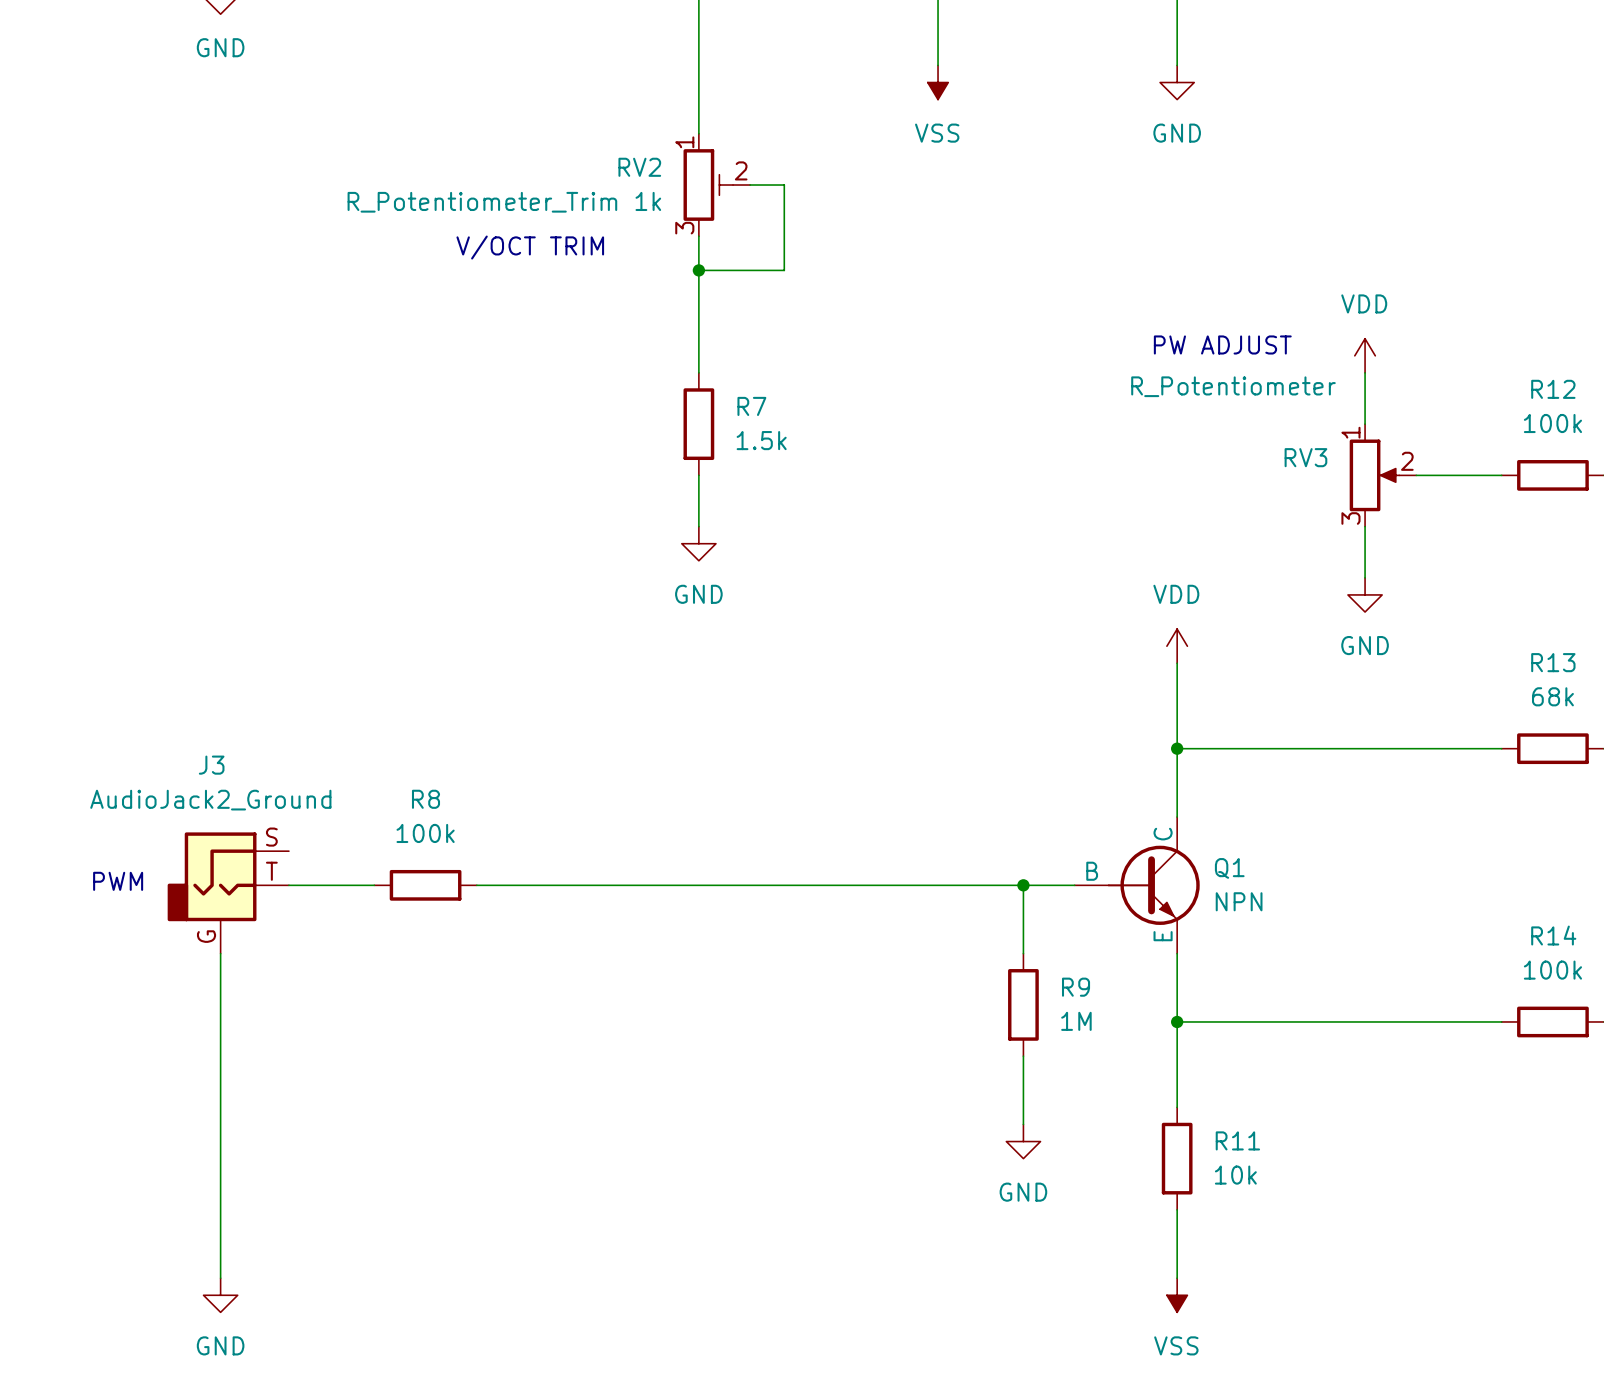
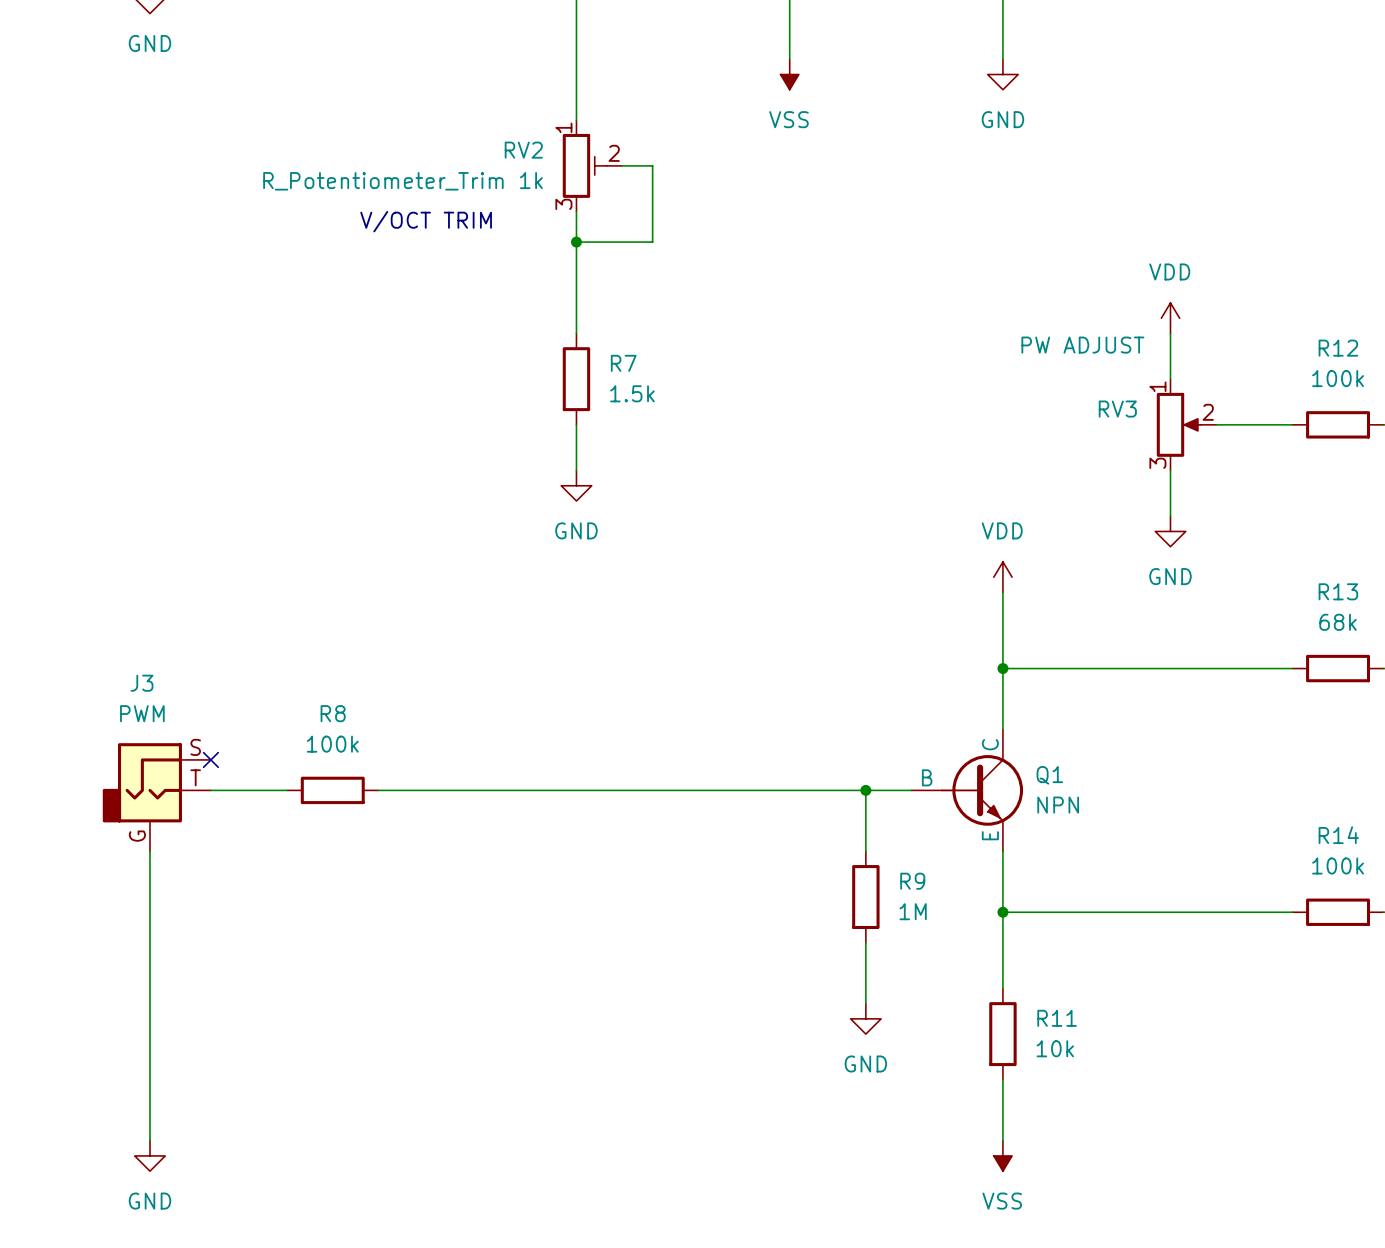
text: PW ADJUST (1222, 344) -> none
RV3 value: R_Potentiometer (1233, 386) -> PW ADJUST (1082, 345)
J3 value: AudioJack2_Ground (210, 800) -> PWM (142, 713)
no-connect mark: none -> (210, 759)
text: PWM (118, 881) -> none

